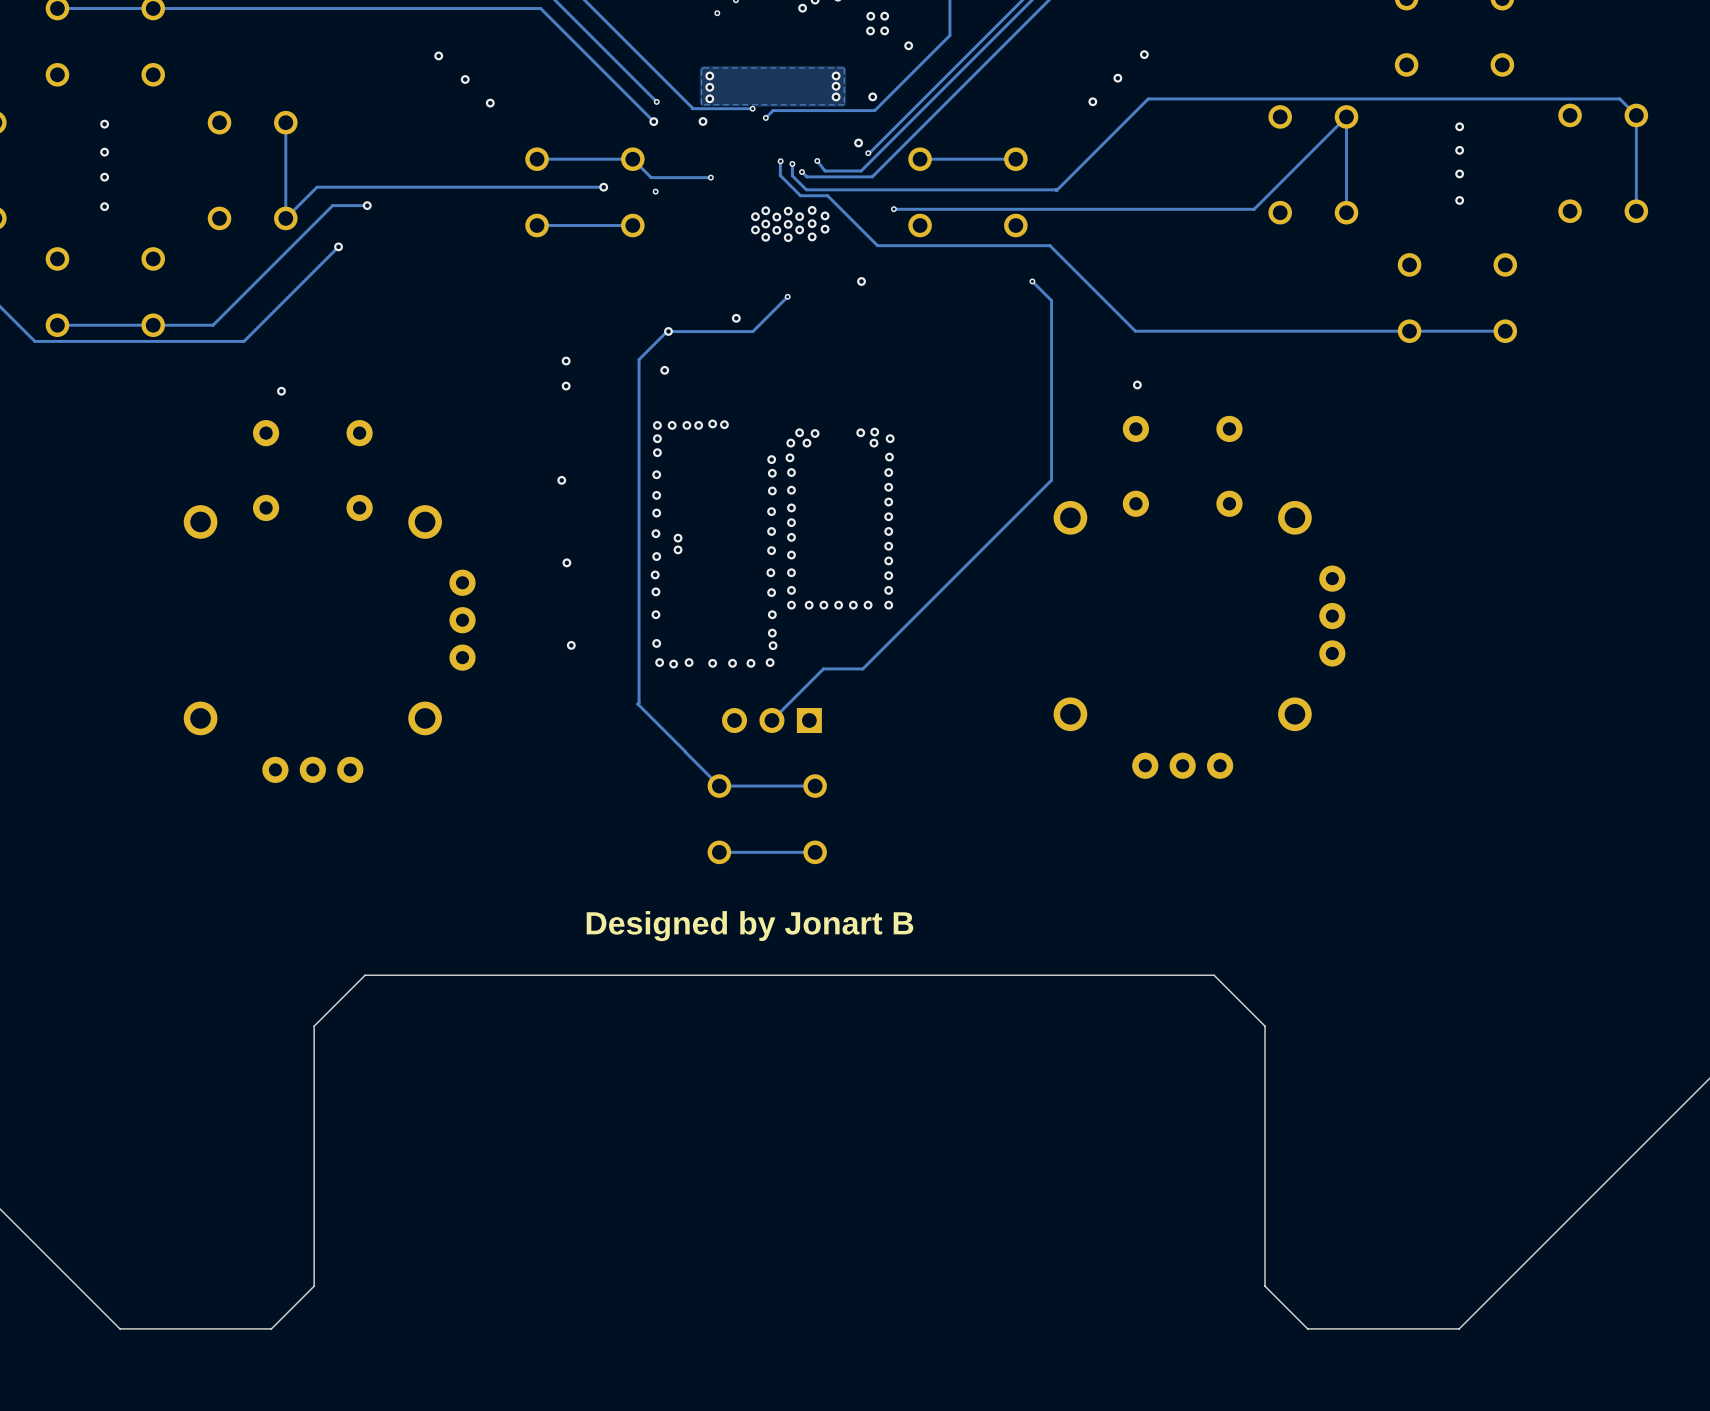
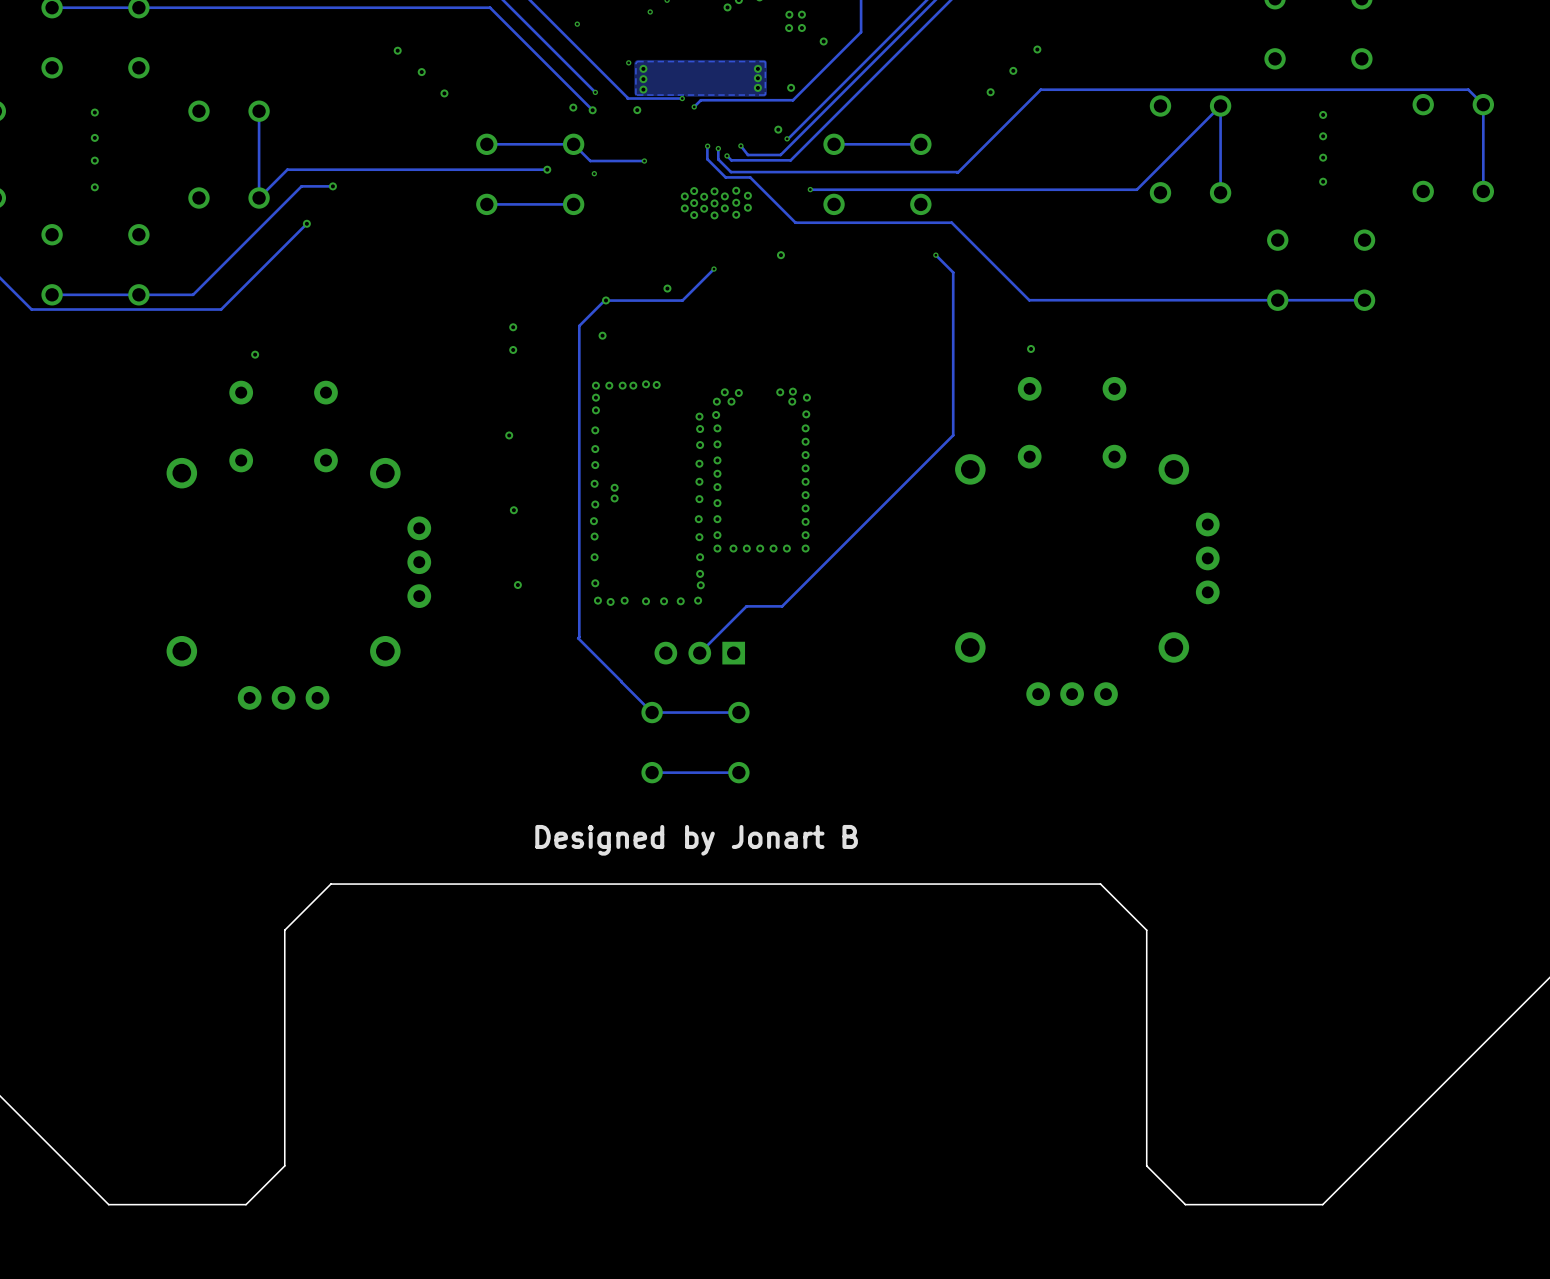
via: none -> (577, 24)
via: none -> (628, 62)
via: none -> (573, 107)

